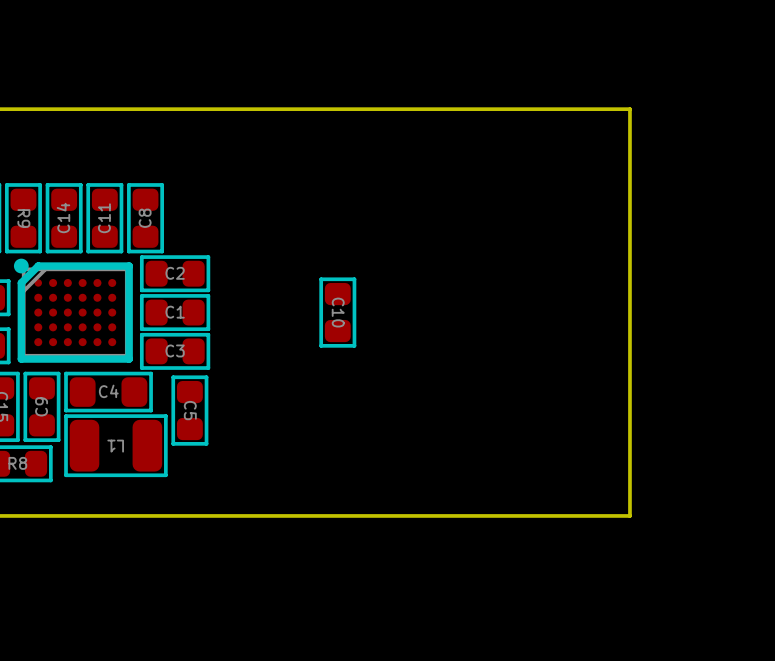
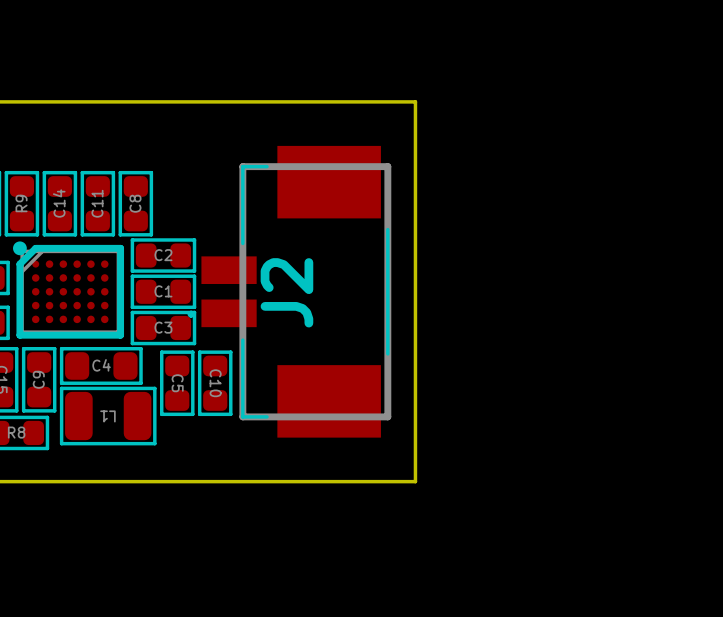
board edge: (445, 109) (629, 109) (629, 515) (445, 515) -> (415, 101) (415, 481)
R9 name rotation: 0° (23, 218) -> 180° (21, 203)
J2: none -> (289, 291)
C10 position: (337, 312) -> (215, 383)

